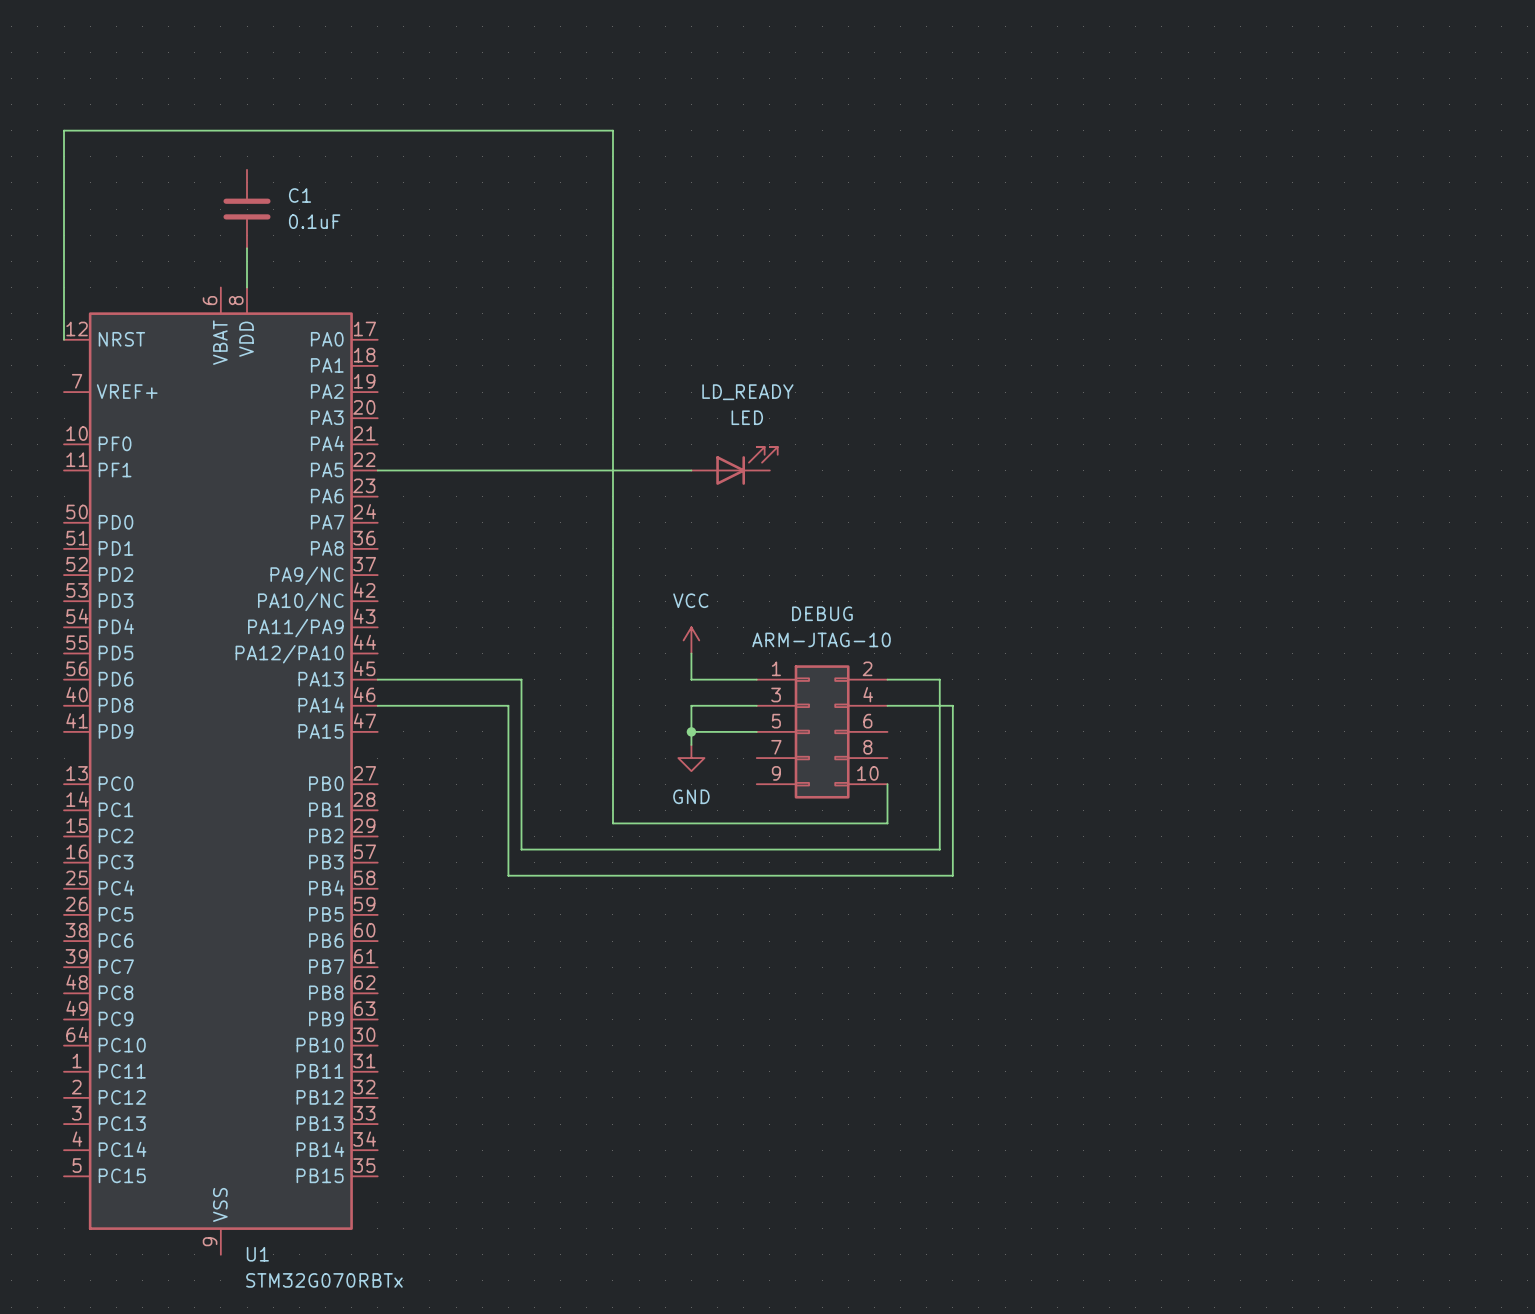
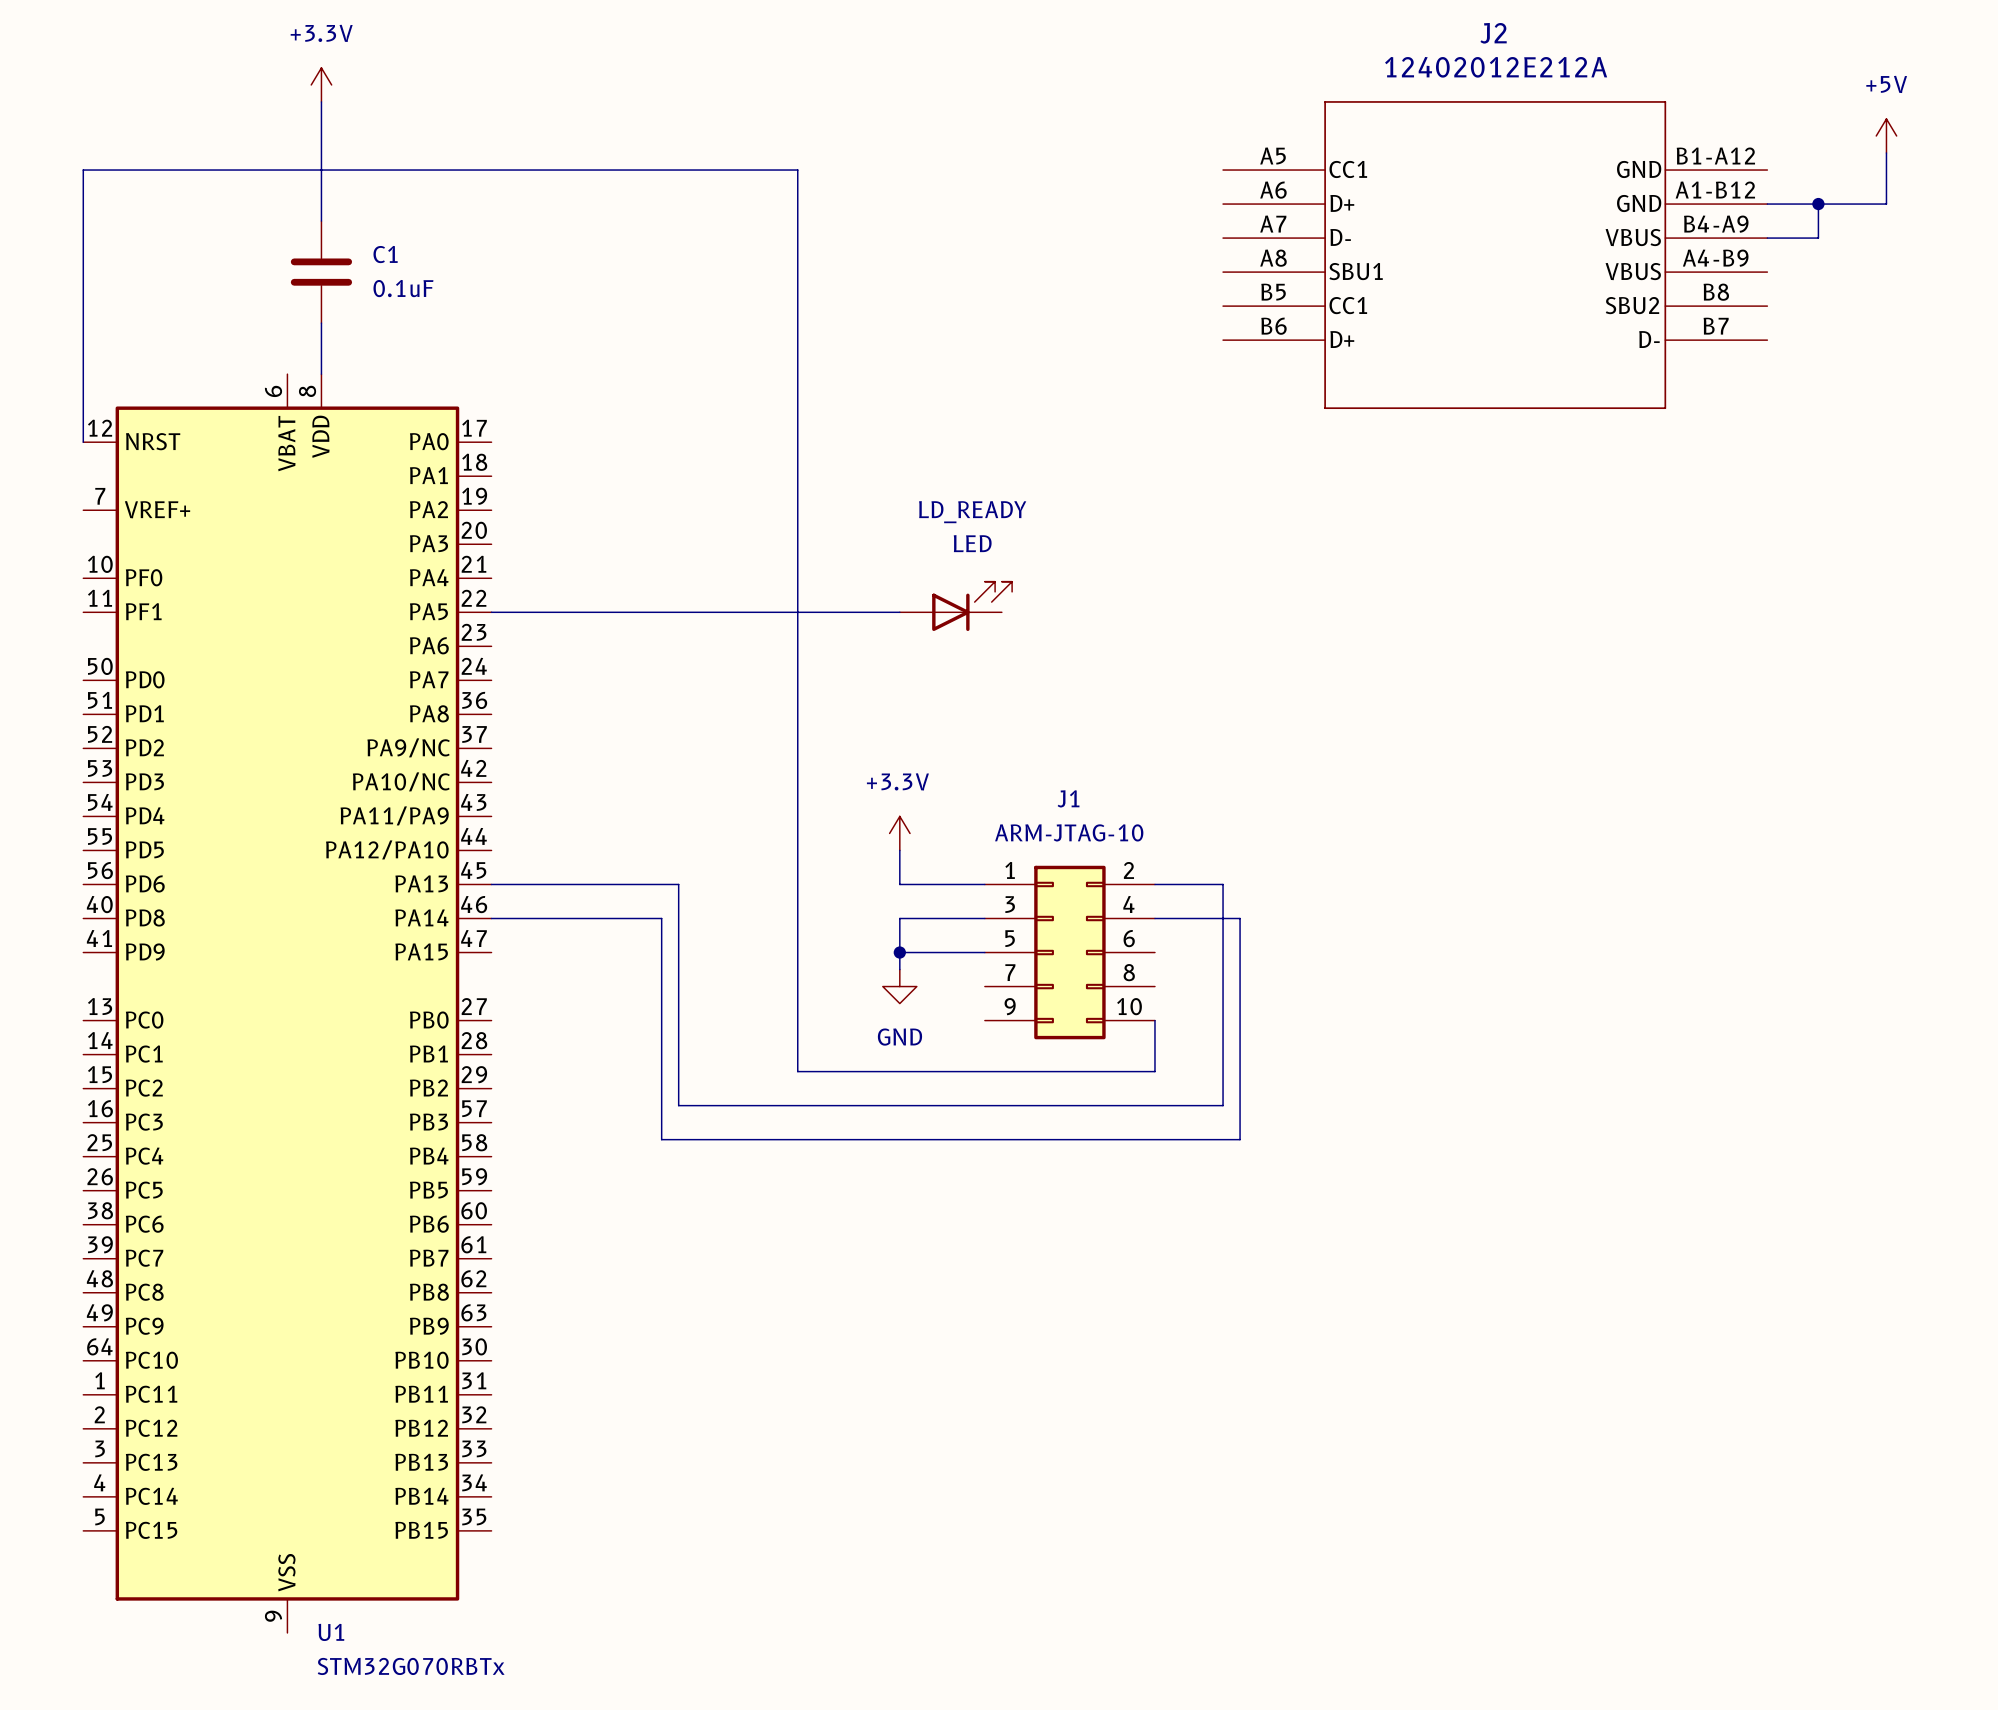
power symbol: none -> +3.3V (321, 84)
wire: none -> (321, 101) (321, 221)
power symbol: none -> +5V (1886, 135)
wire: none -> (1886, 153) (1886, 204) (1767, 204)
wire: none -> (1818, 204) (1818, 238) (1767, 238)
junction: none -> (1818, 204)
J2: none -> 12402012E212A (1495, 255)
DEBUG name: DEBUG (822, 613) -> J1 (1068, 798)
power symbol: VCC (691, 640) -> +3.3V (899, 833)

